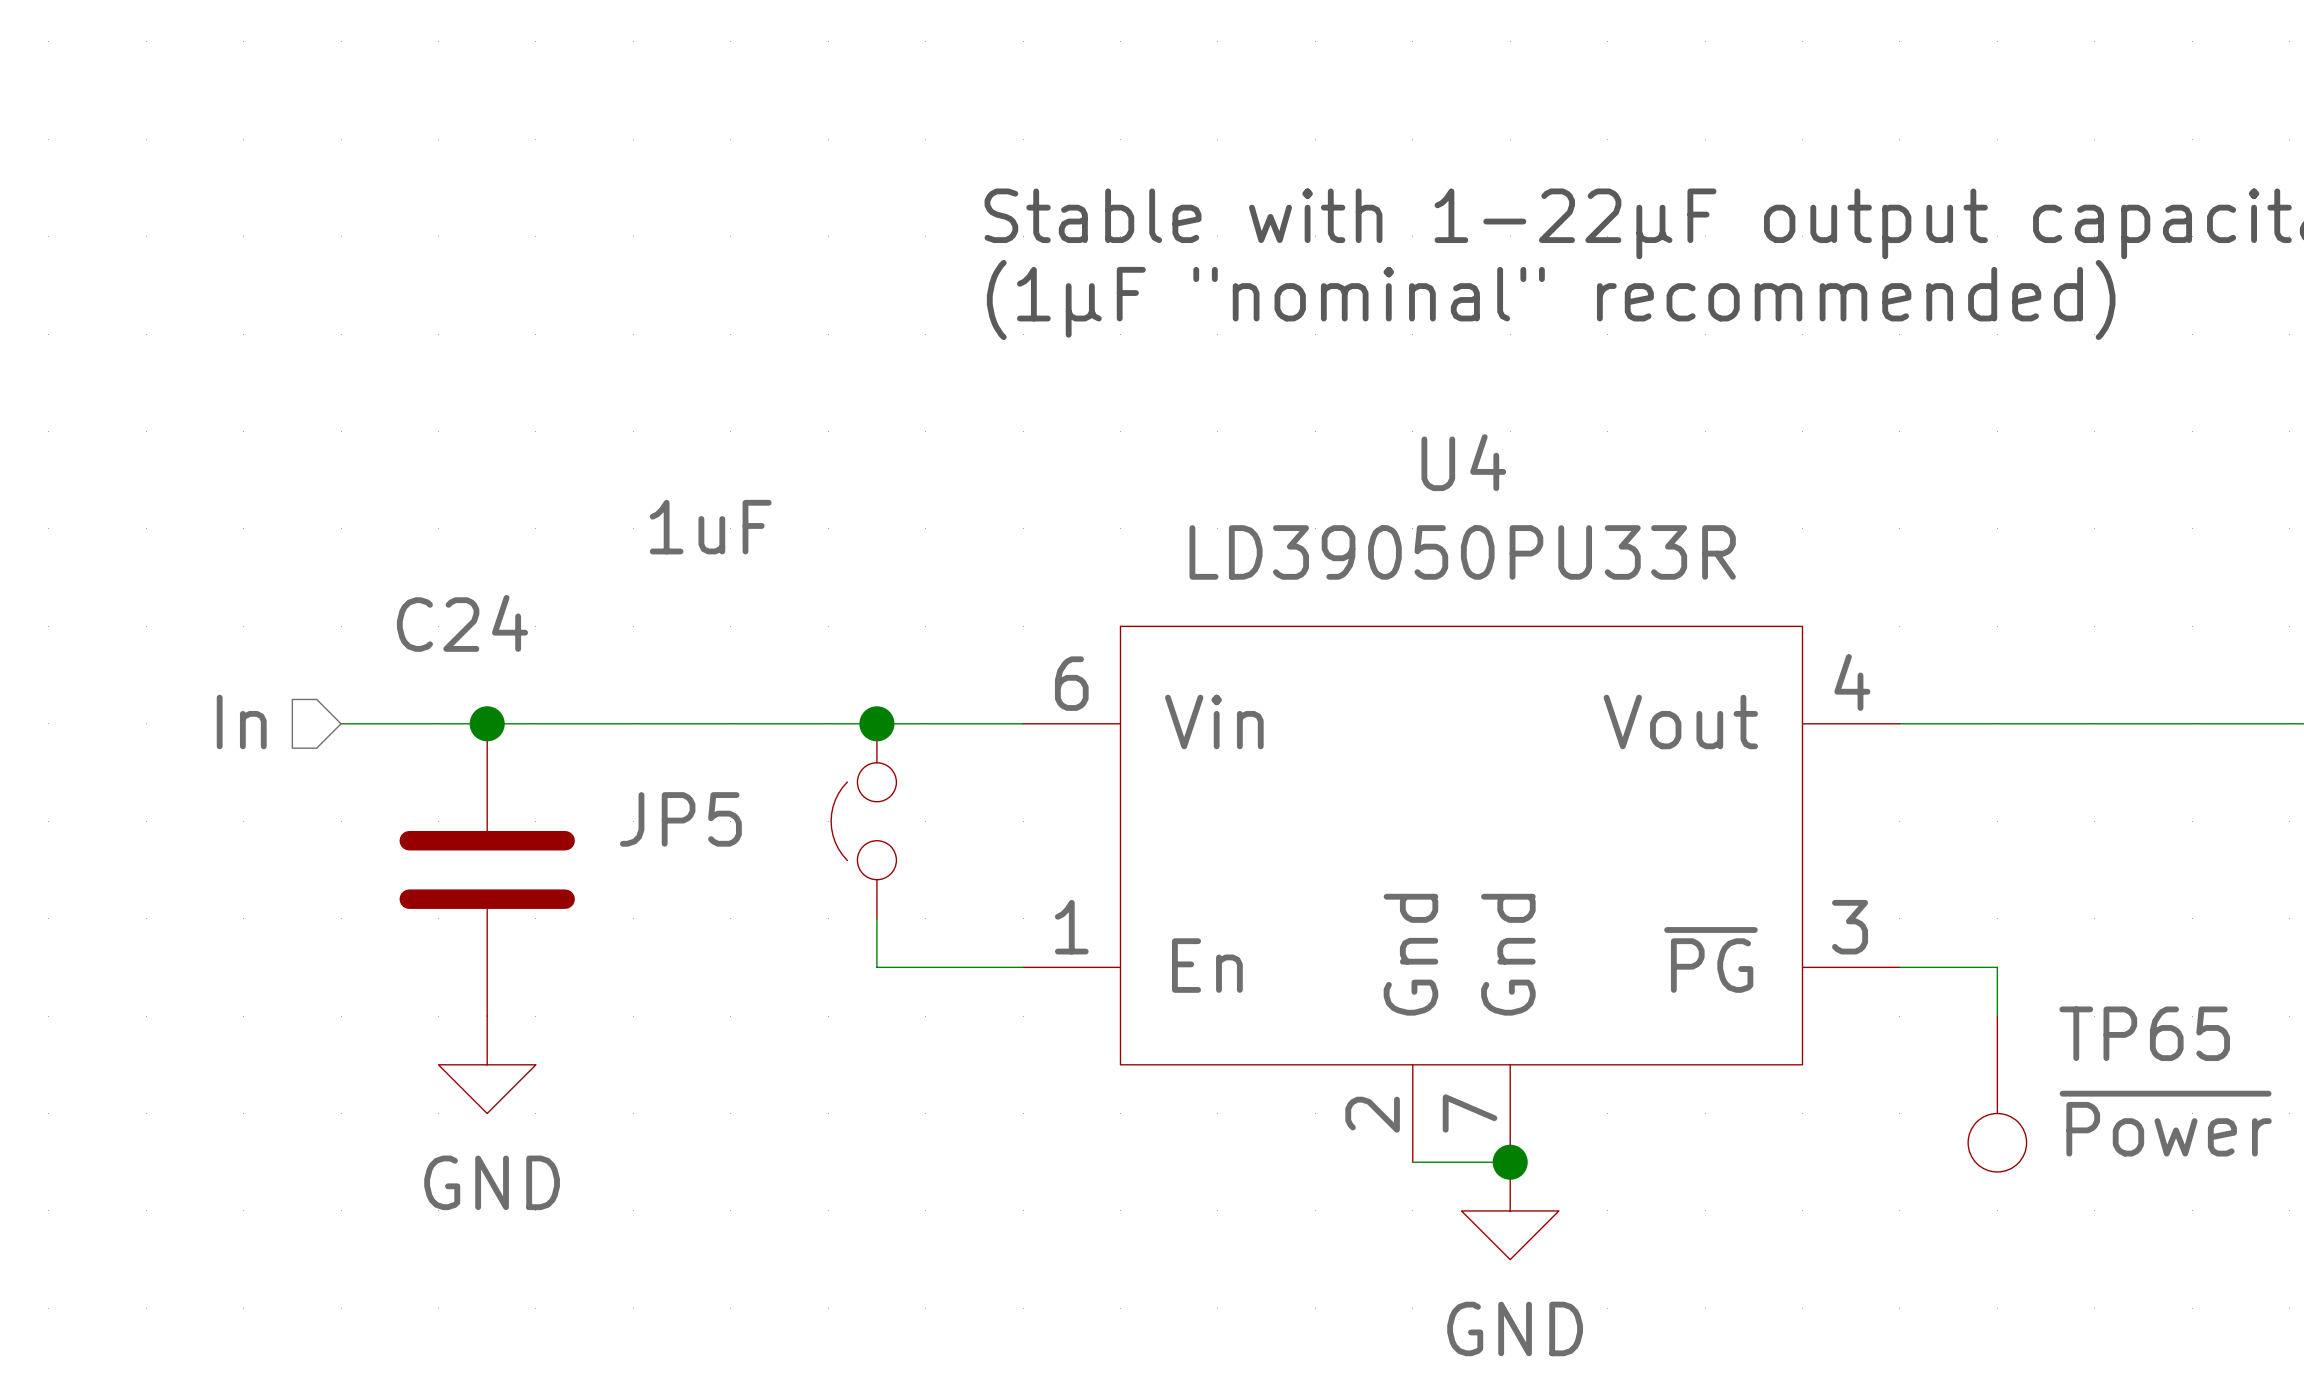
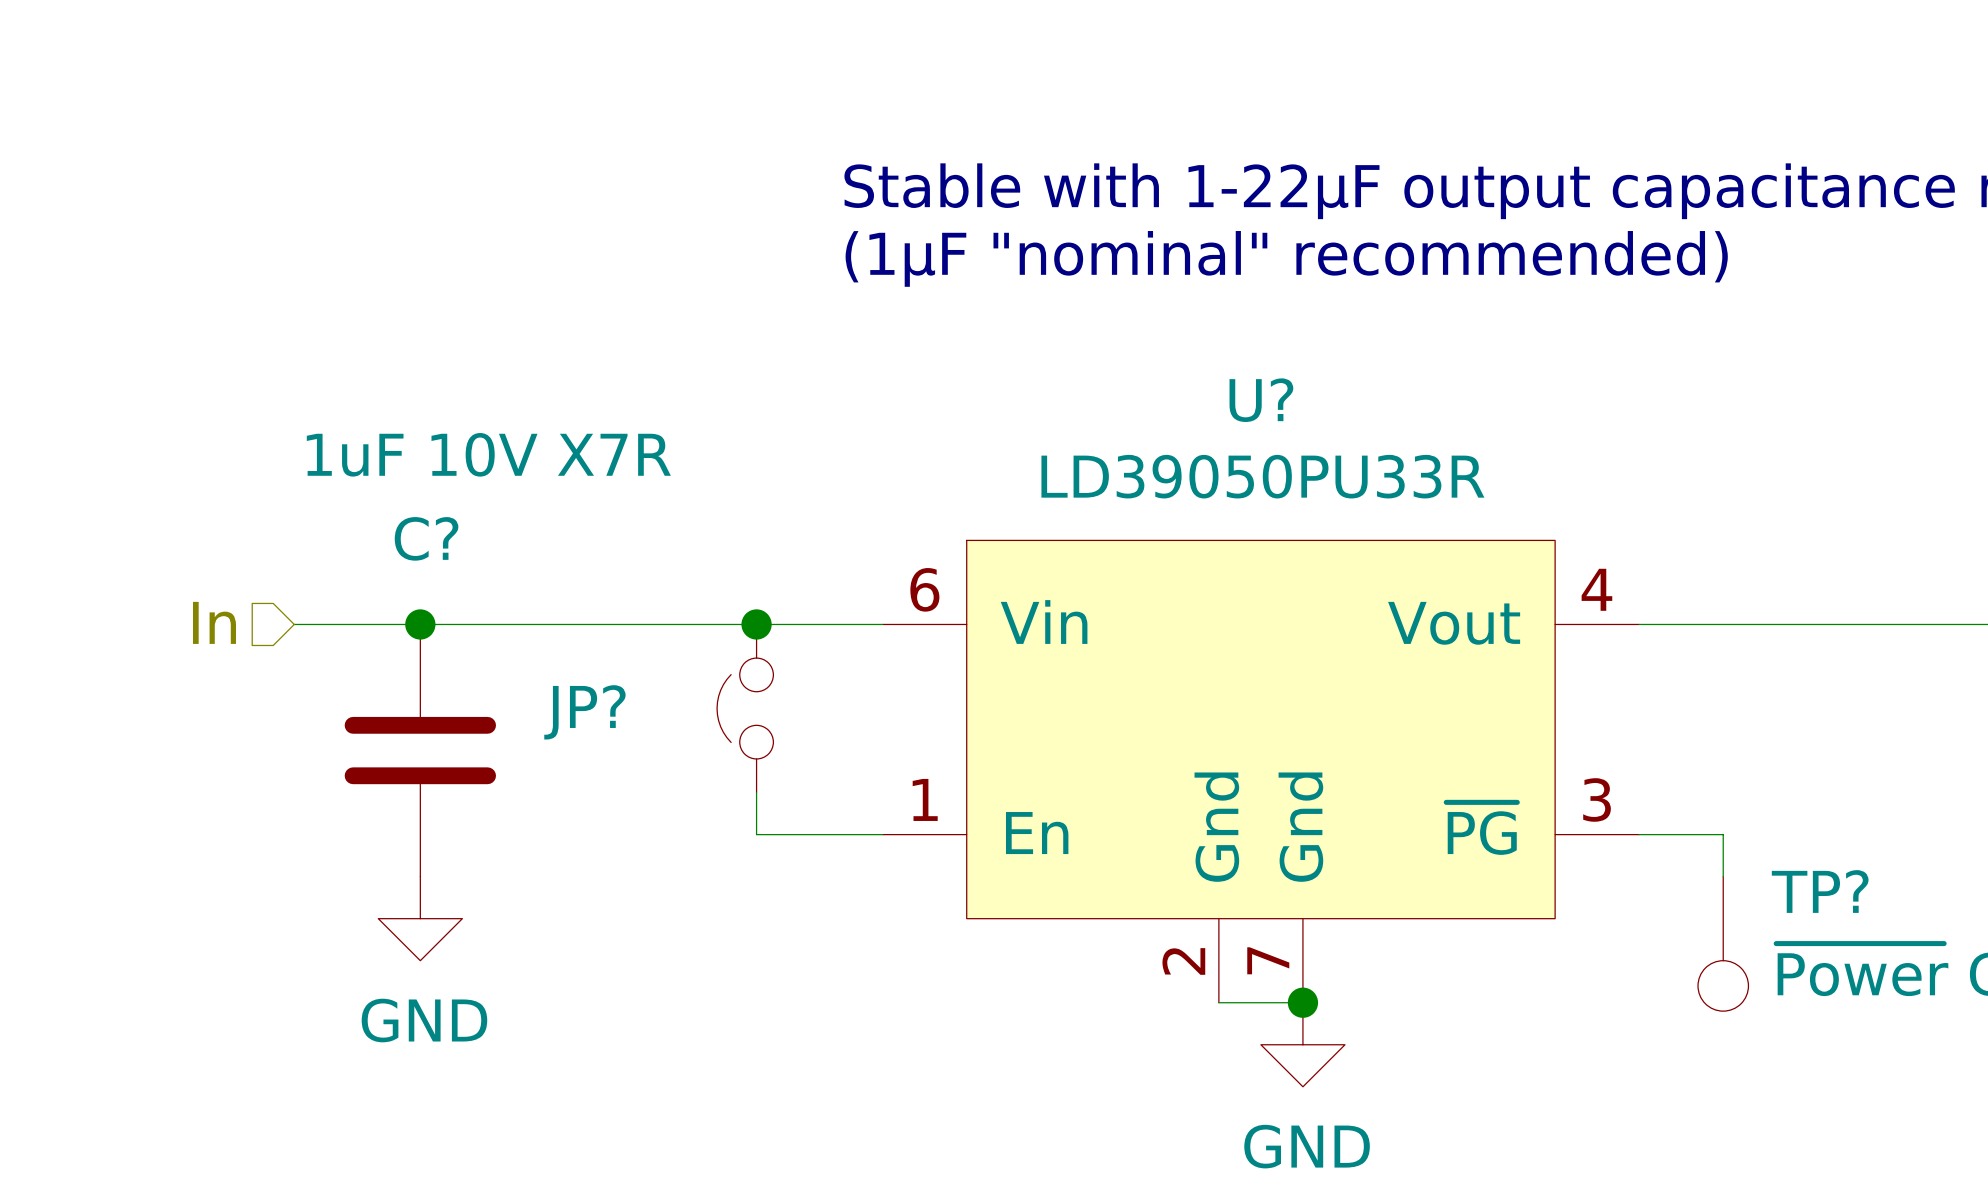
U4 name: U4 (1463, 462) -> U? (1261, 400)
C24 value: 1uF (710, 527) -> 1uF 10V X7R (488, 454)
C24 name: C24 (462, 623) -> C? (426, 538)
JP5 name: JP5 (680, 819) -> JP? (584, 712)
TP65 name: TP65 (2144, 1033) -> TP? (1820, 891)

